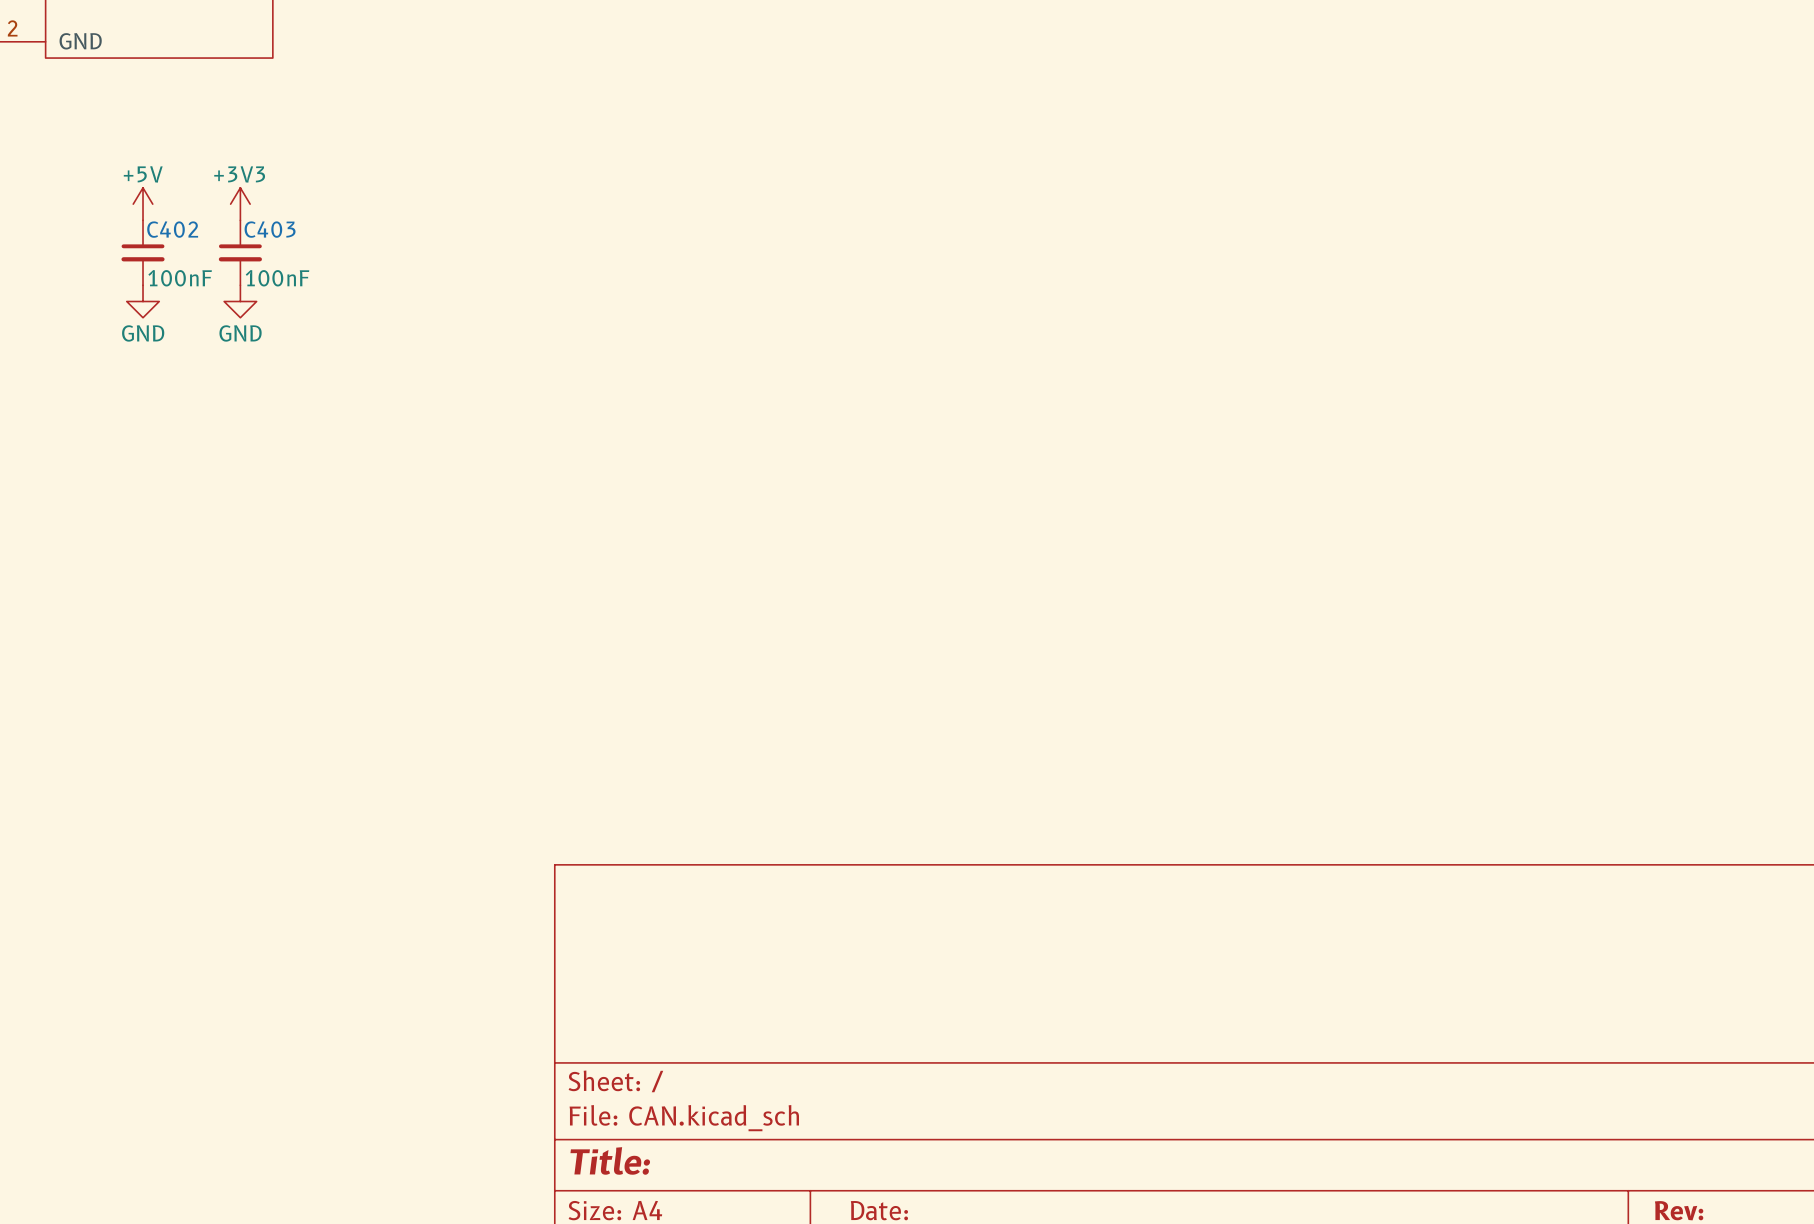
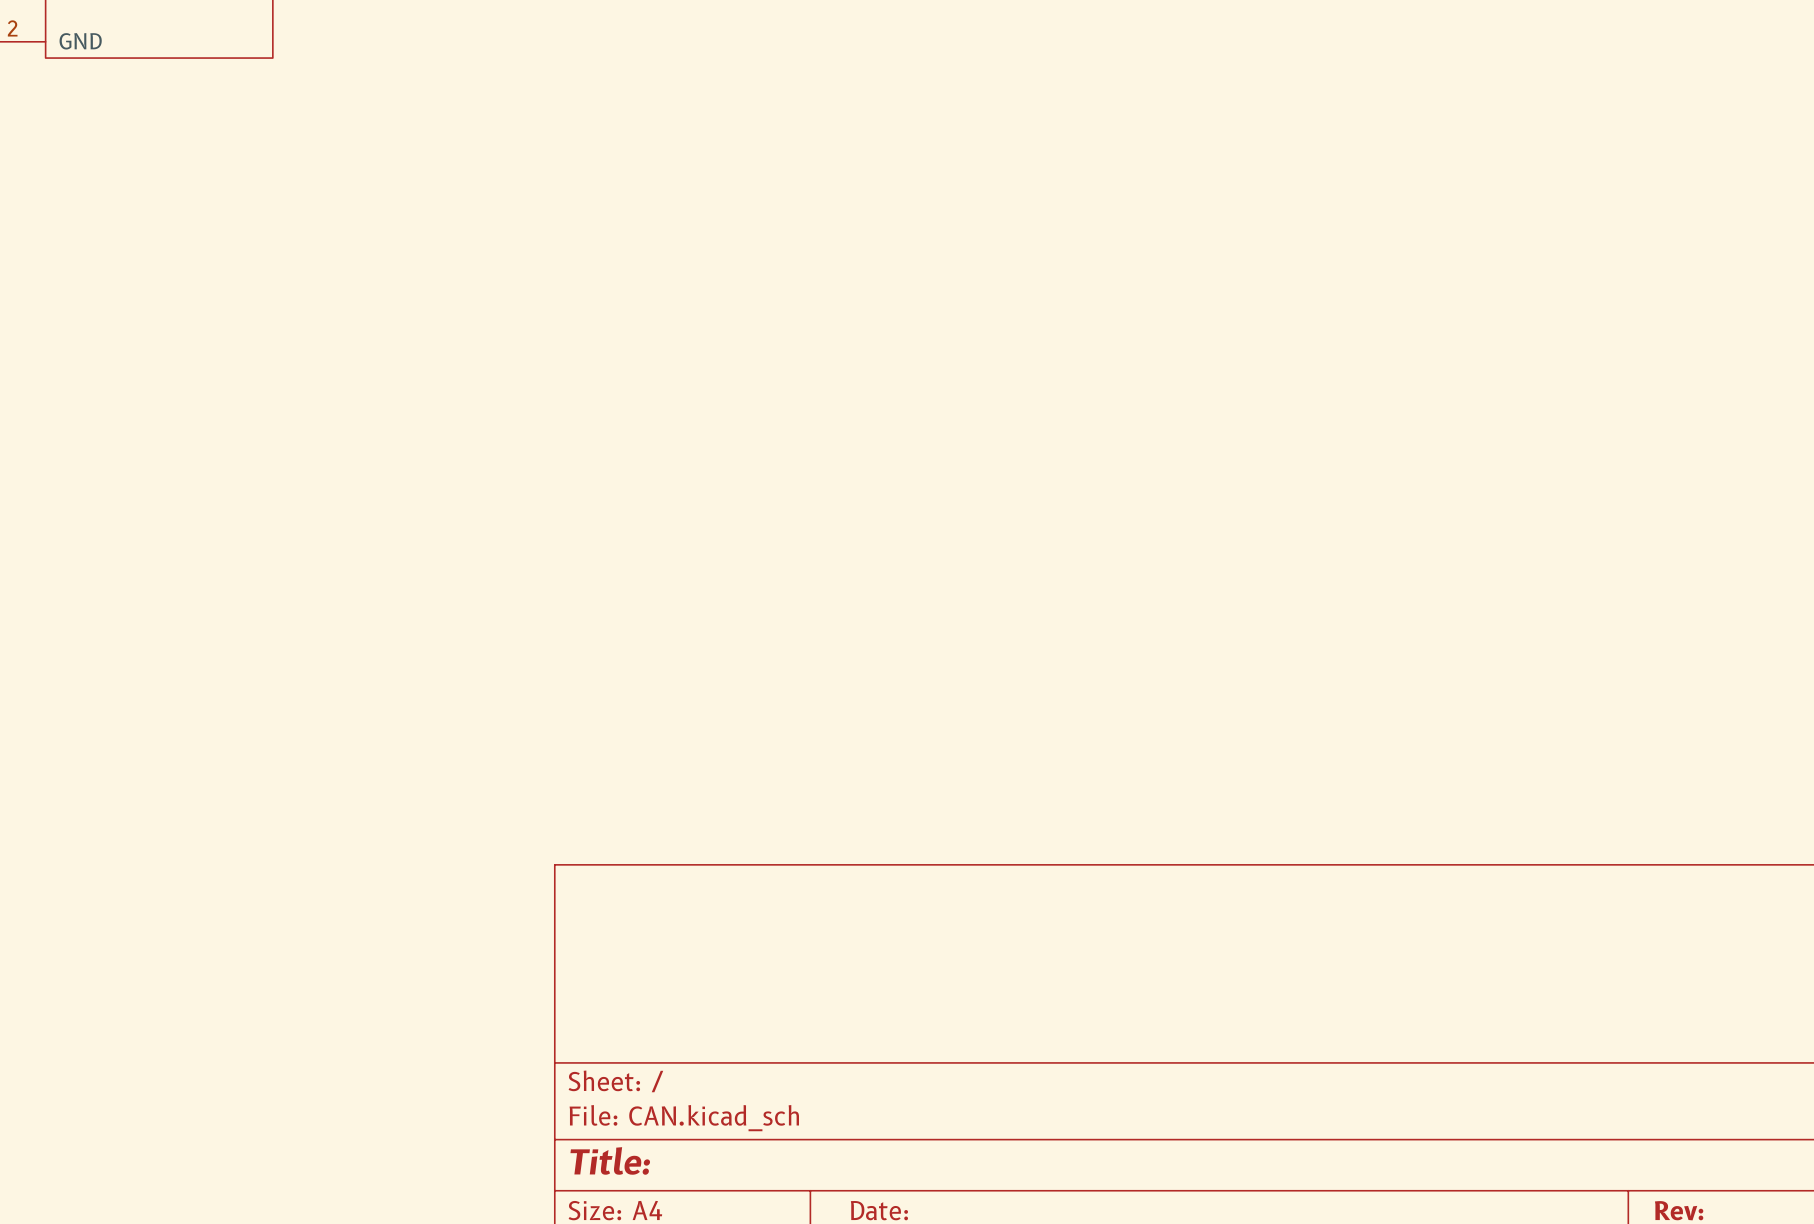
power symbol: +5V (143, 204) -> none
power symbol: +3V3 (240, 204) -> none
C402: 100nF (143, 252) -> none
C403: 100nF (240, 252) -> none
power symbol: GND (143, 301) -> none
power symbol: GND (240, 301) -> none

